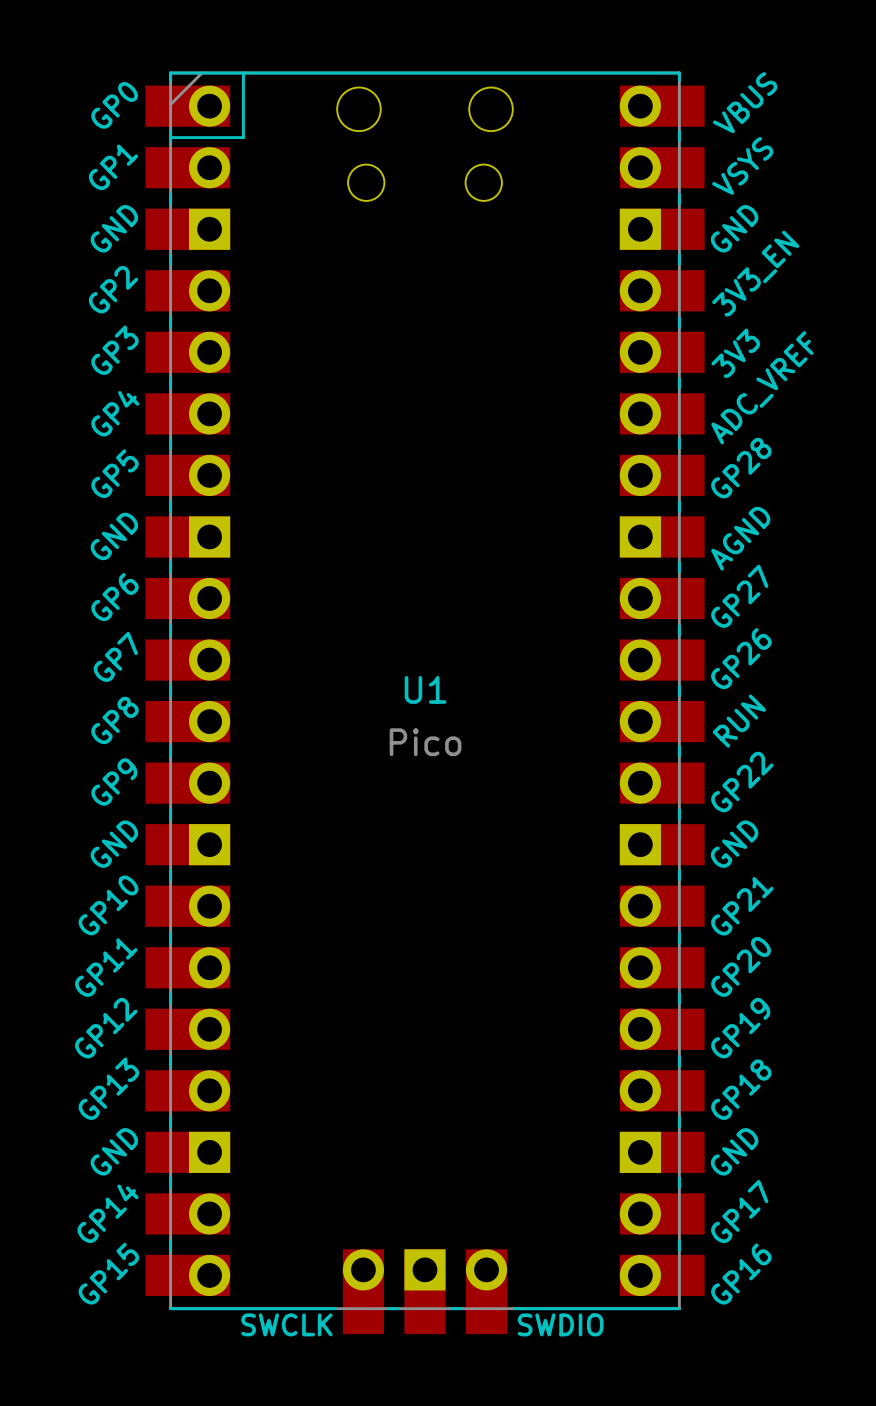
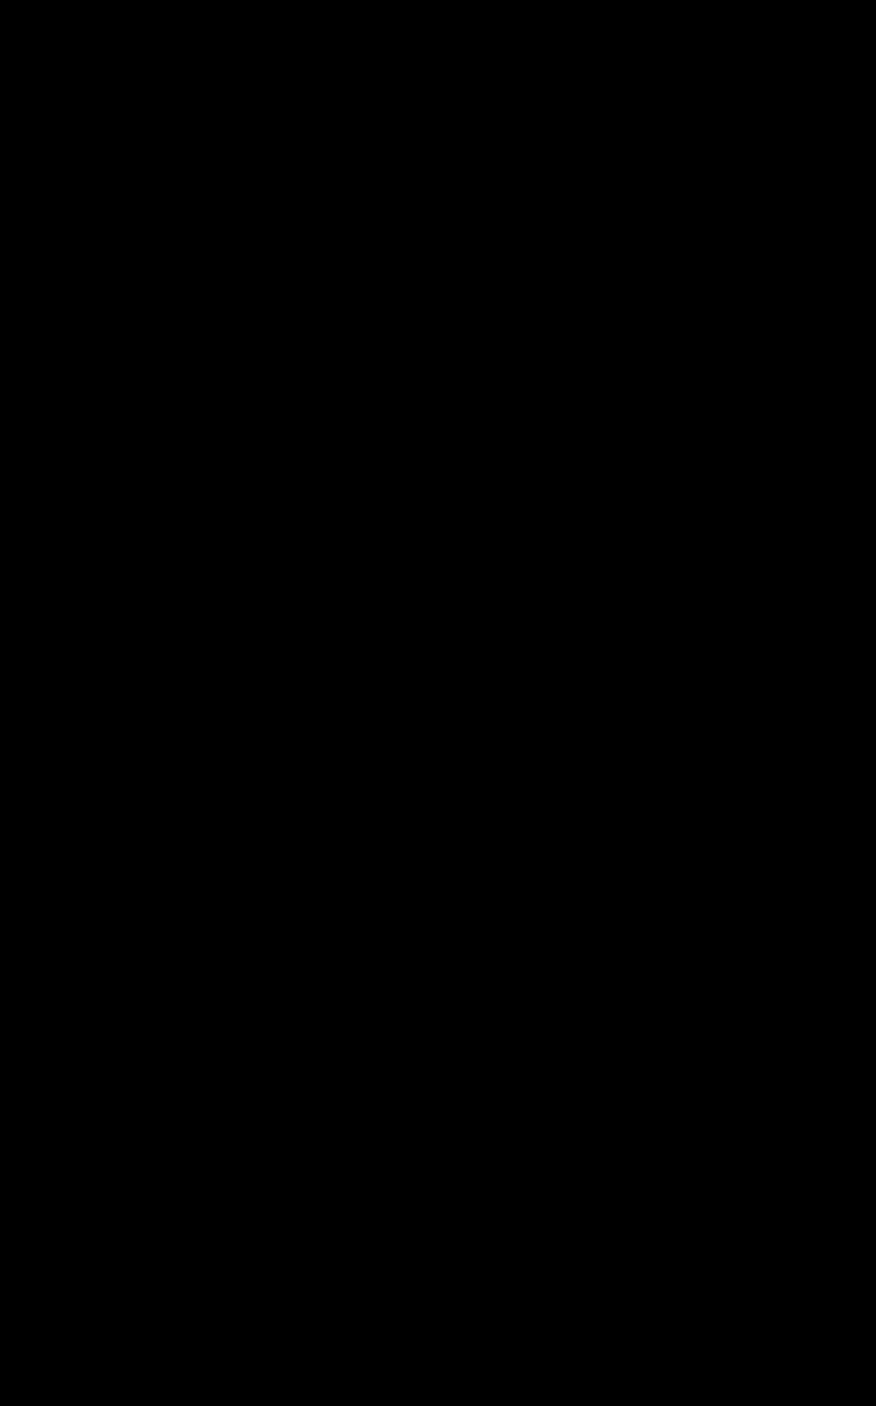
U1: Pico (424, 702) -> none

